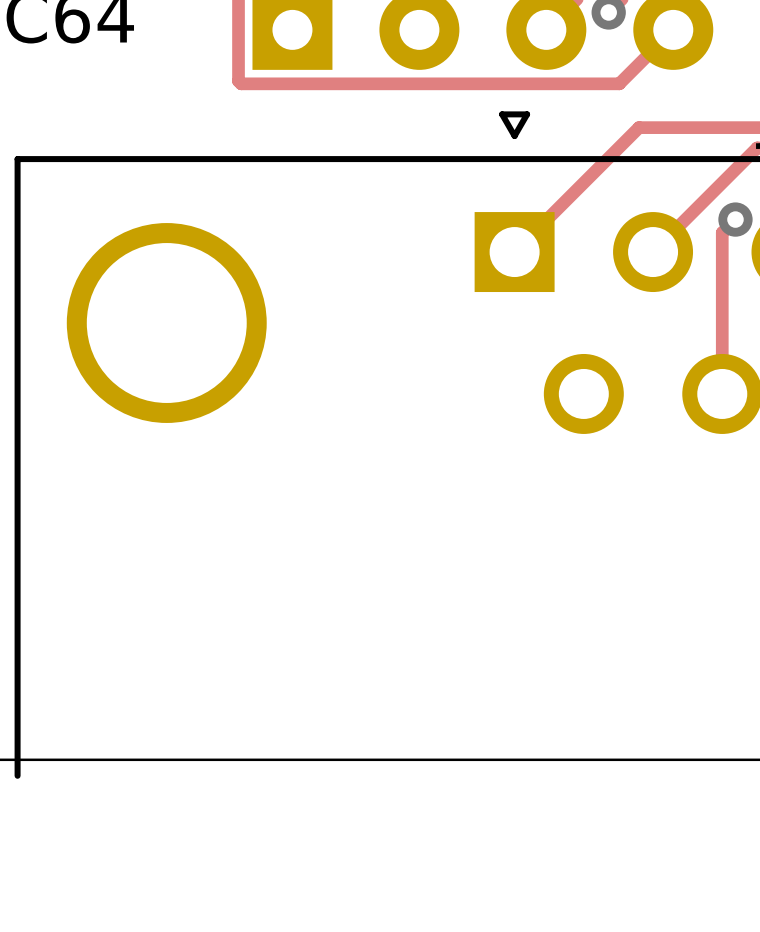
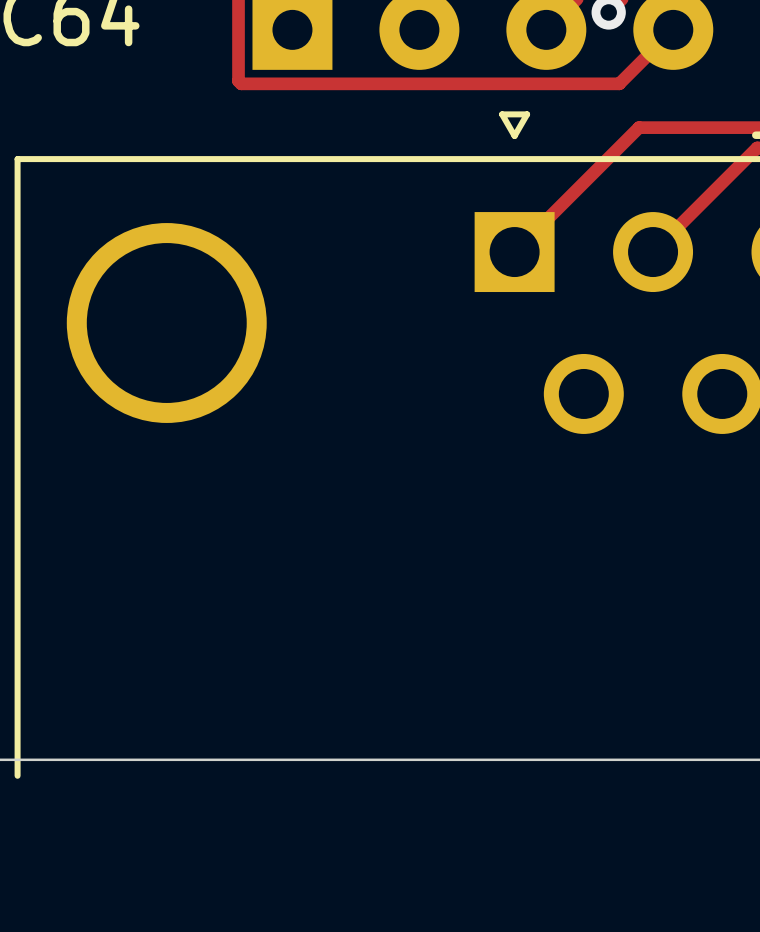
track: (735, 219) (722, 232) (722, 393) -> none
via: (735, 219) -> none

